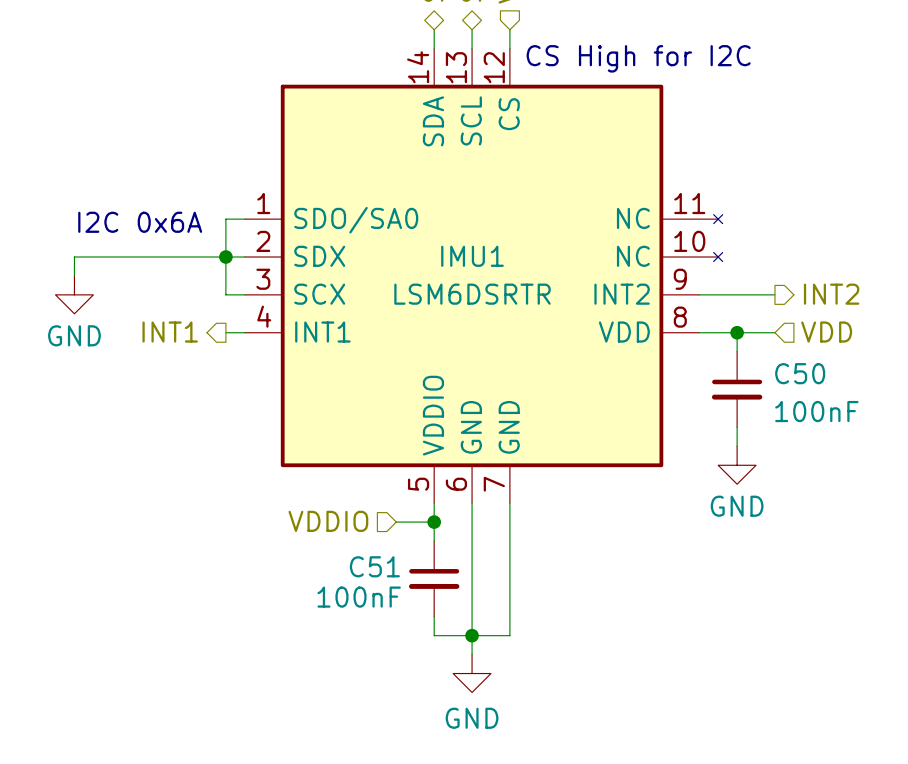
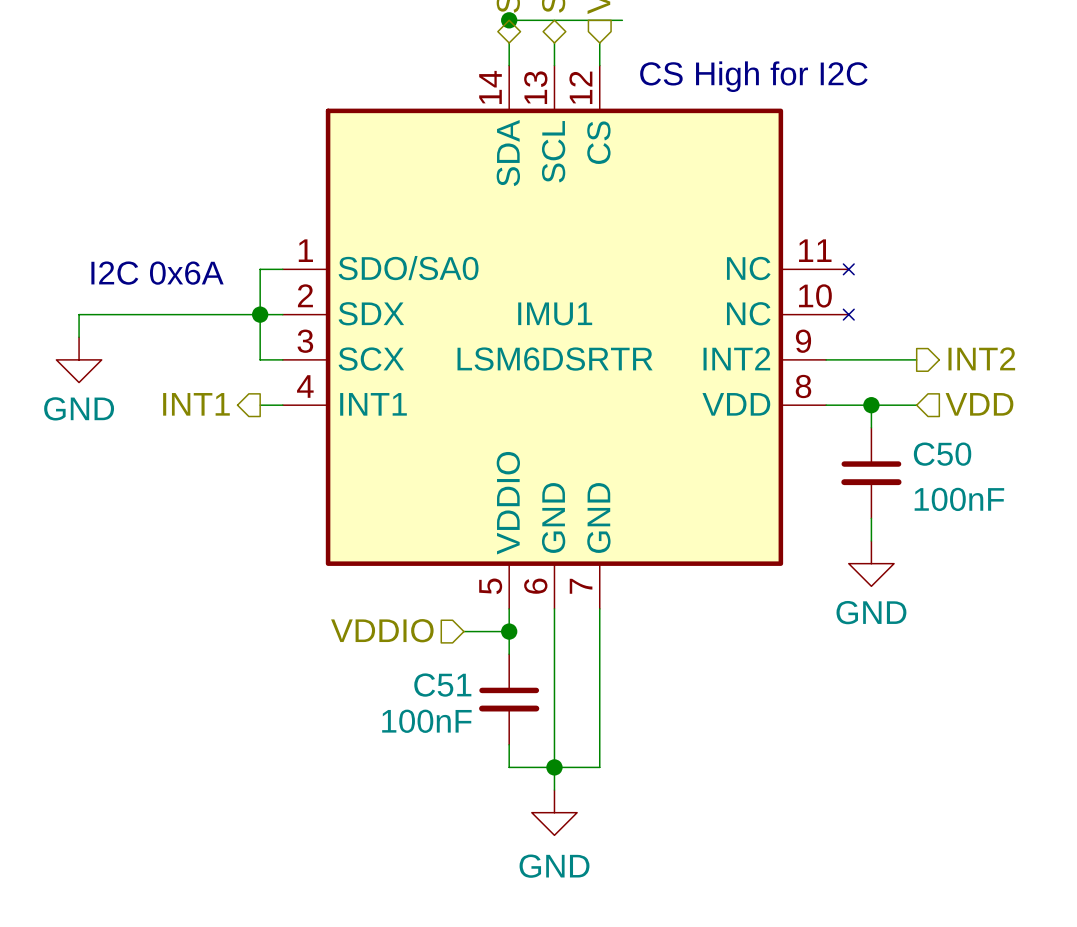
wire: none -> (509, 20) (622, 20)
junction: none -> (509, 20)

